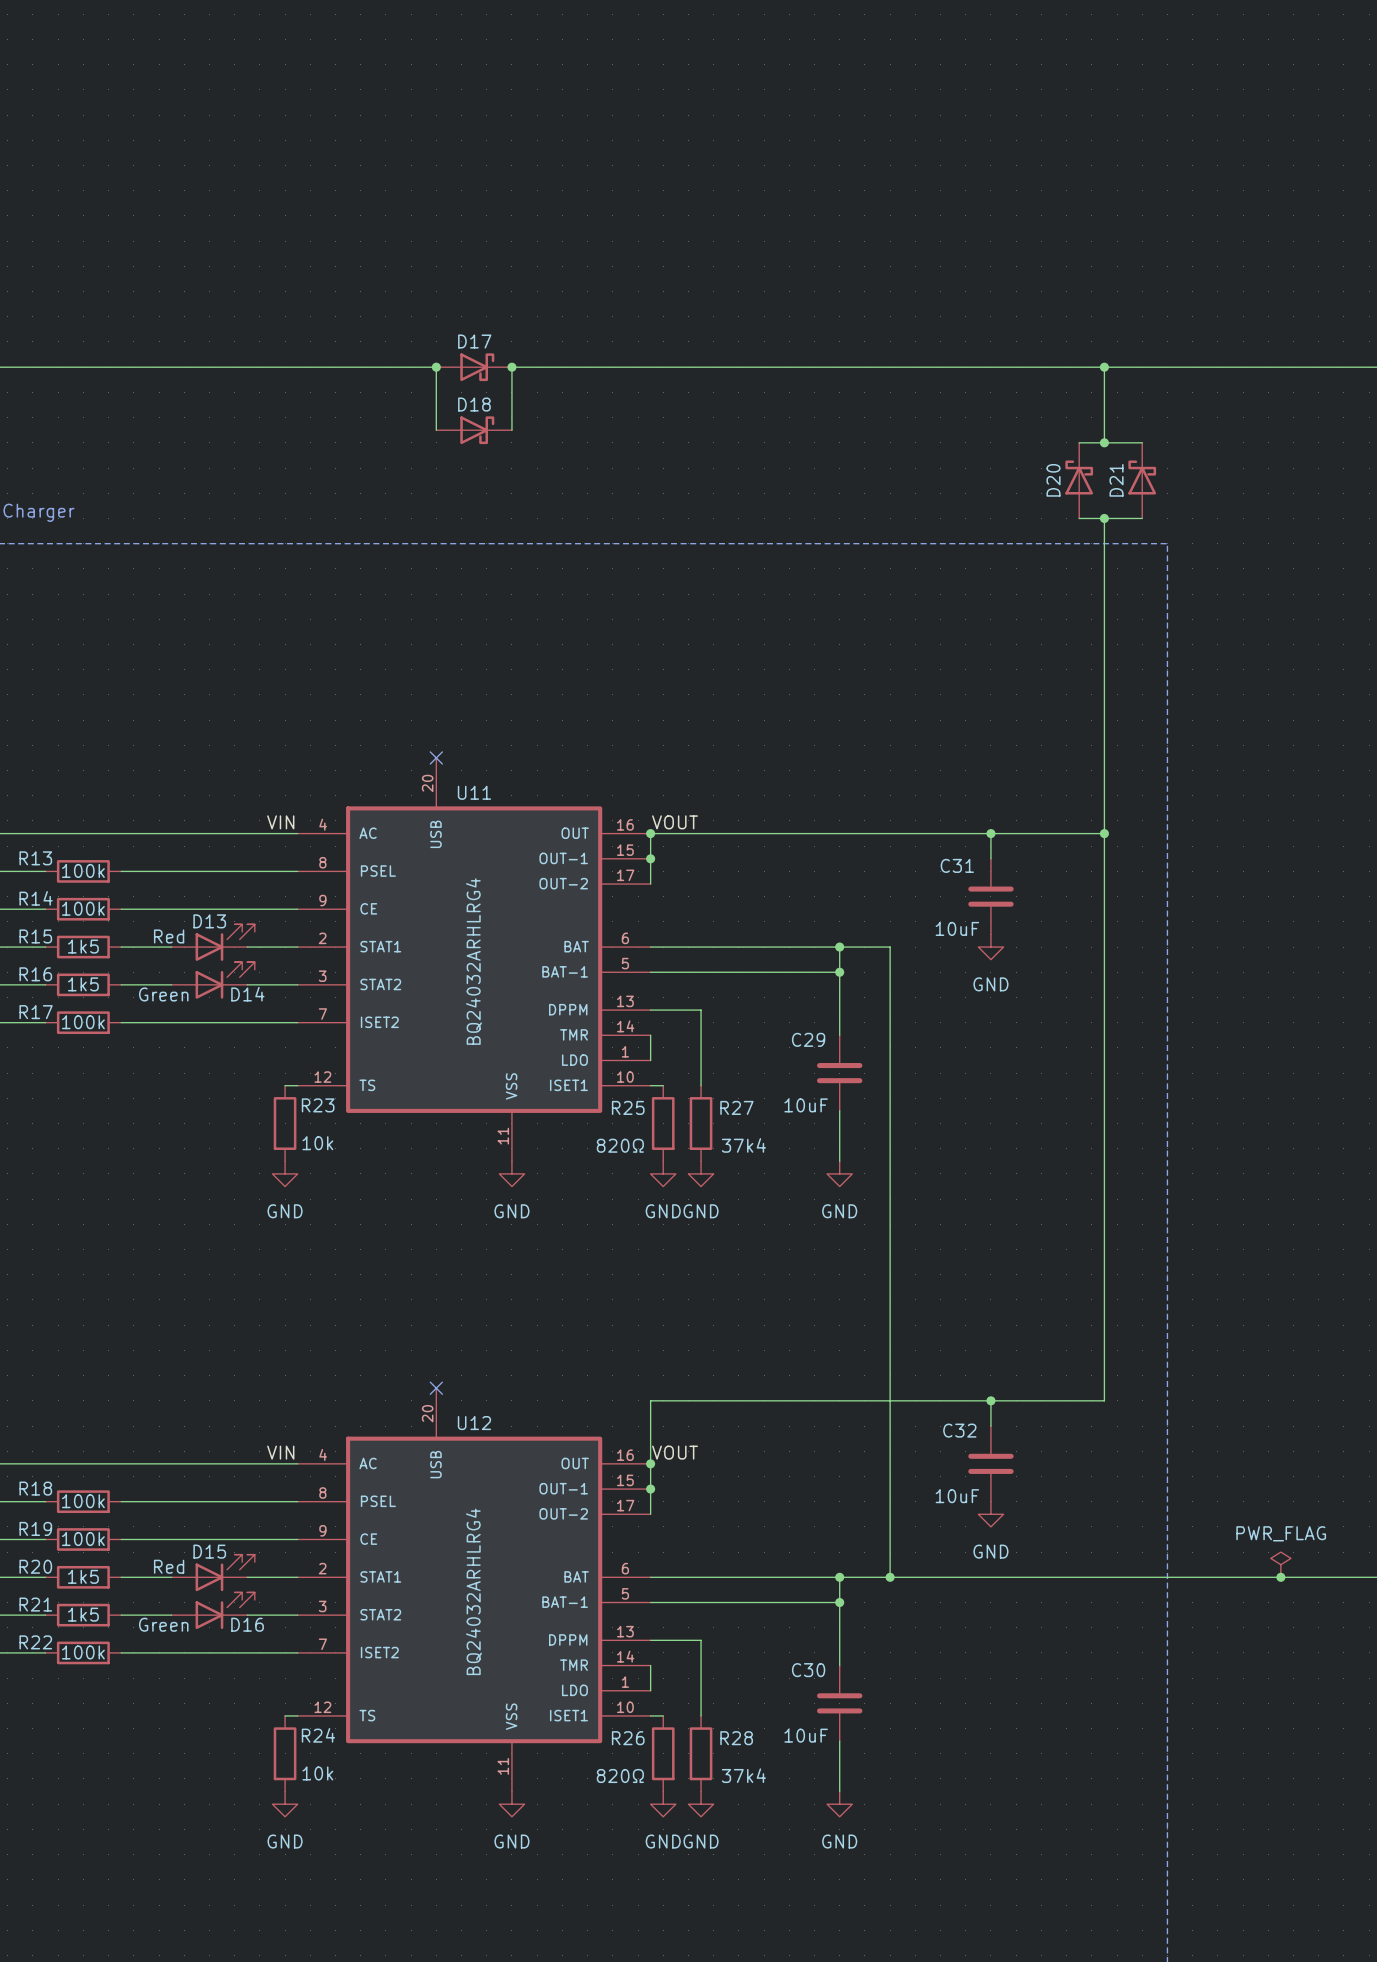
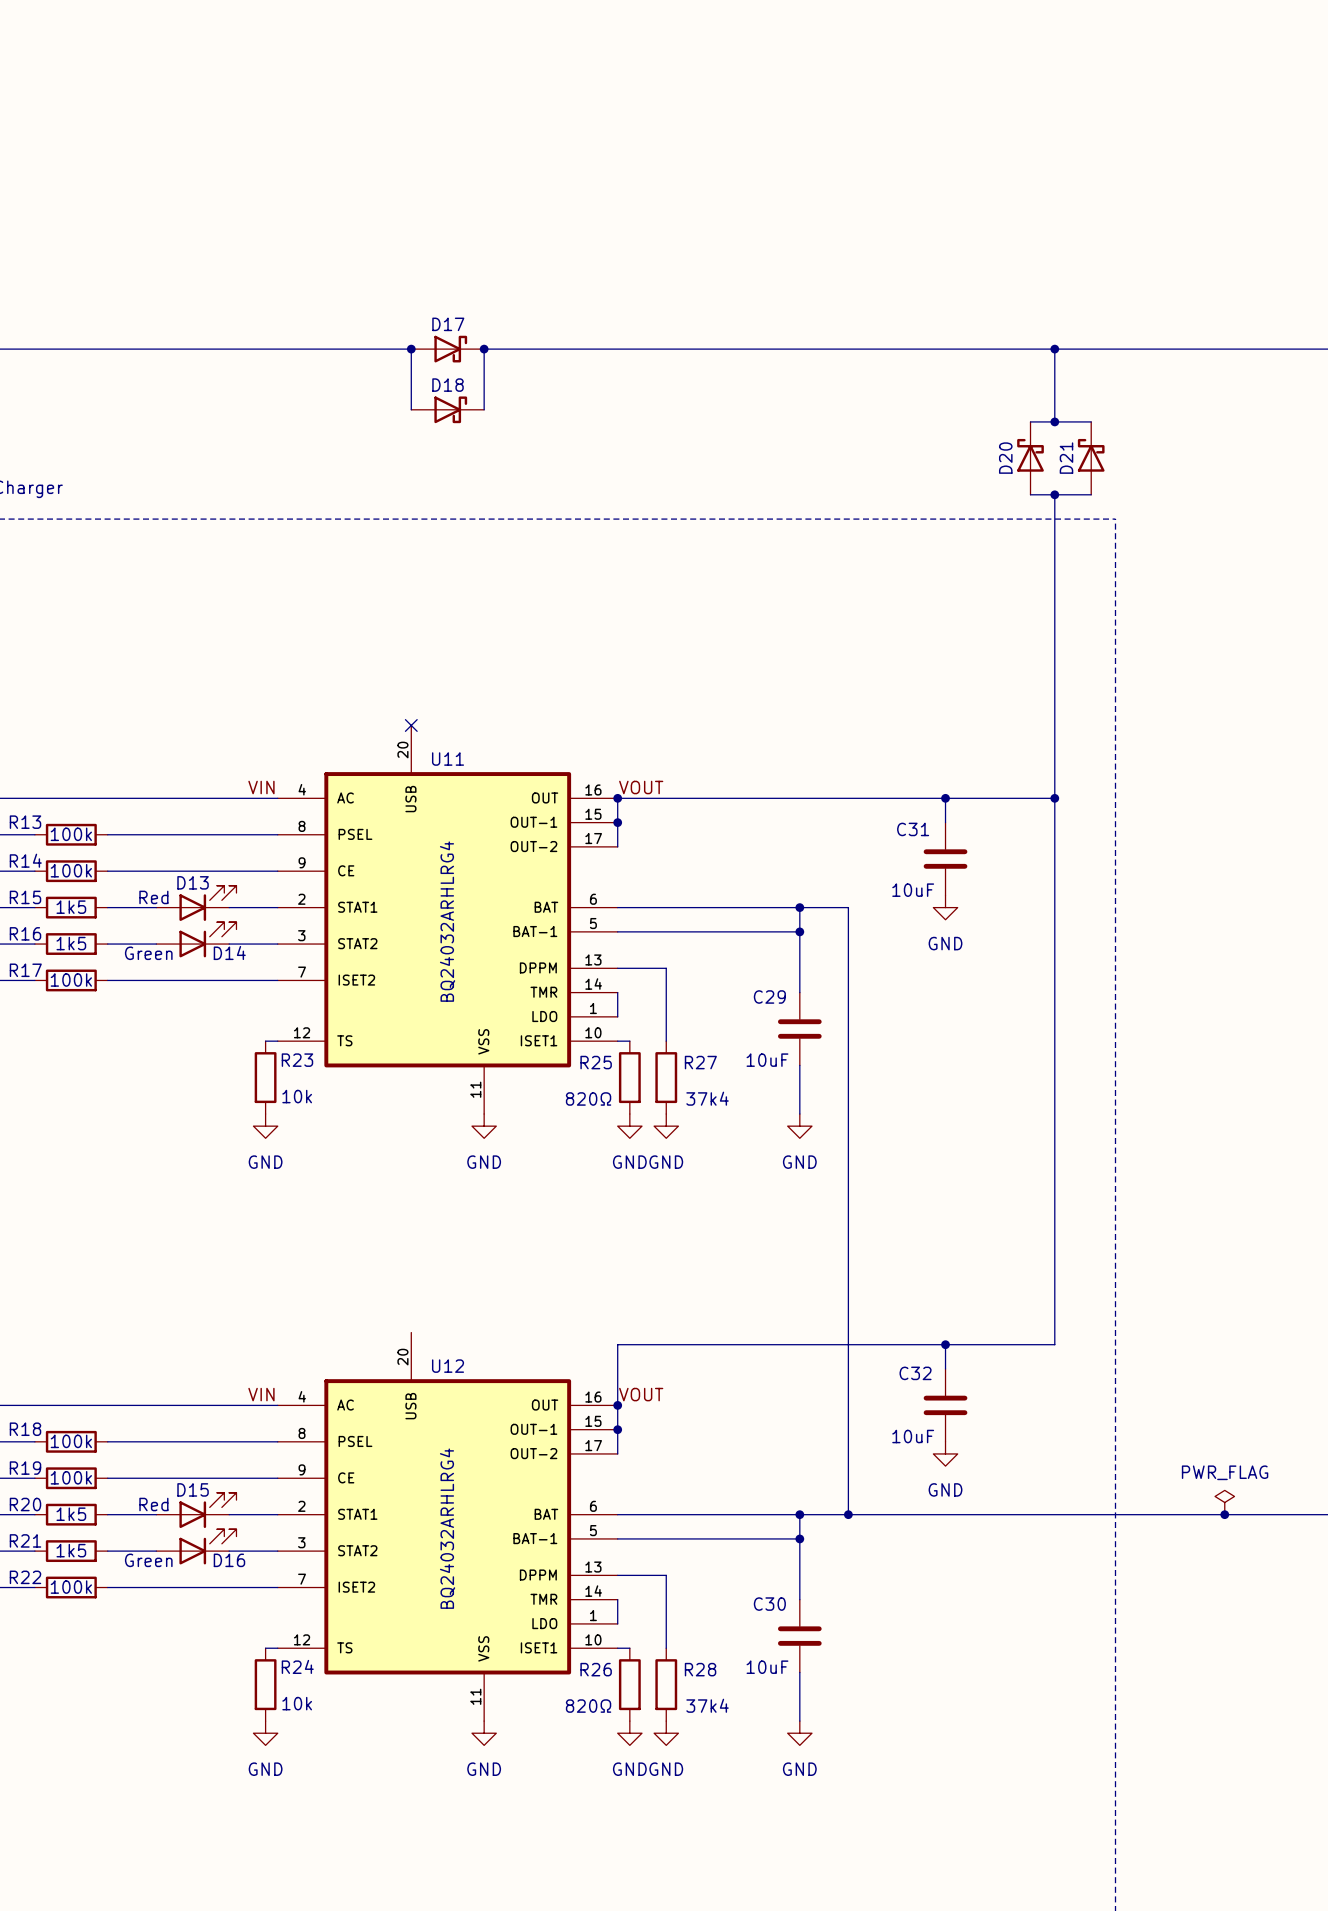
no-connect mark: (436, 1388) -> none

